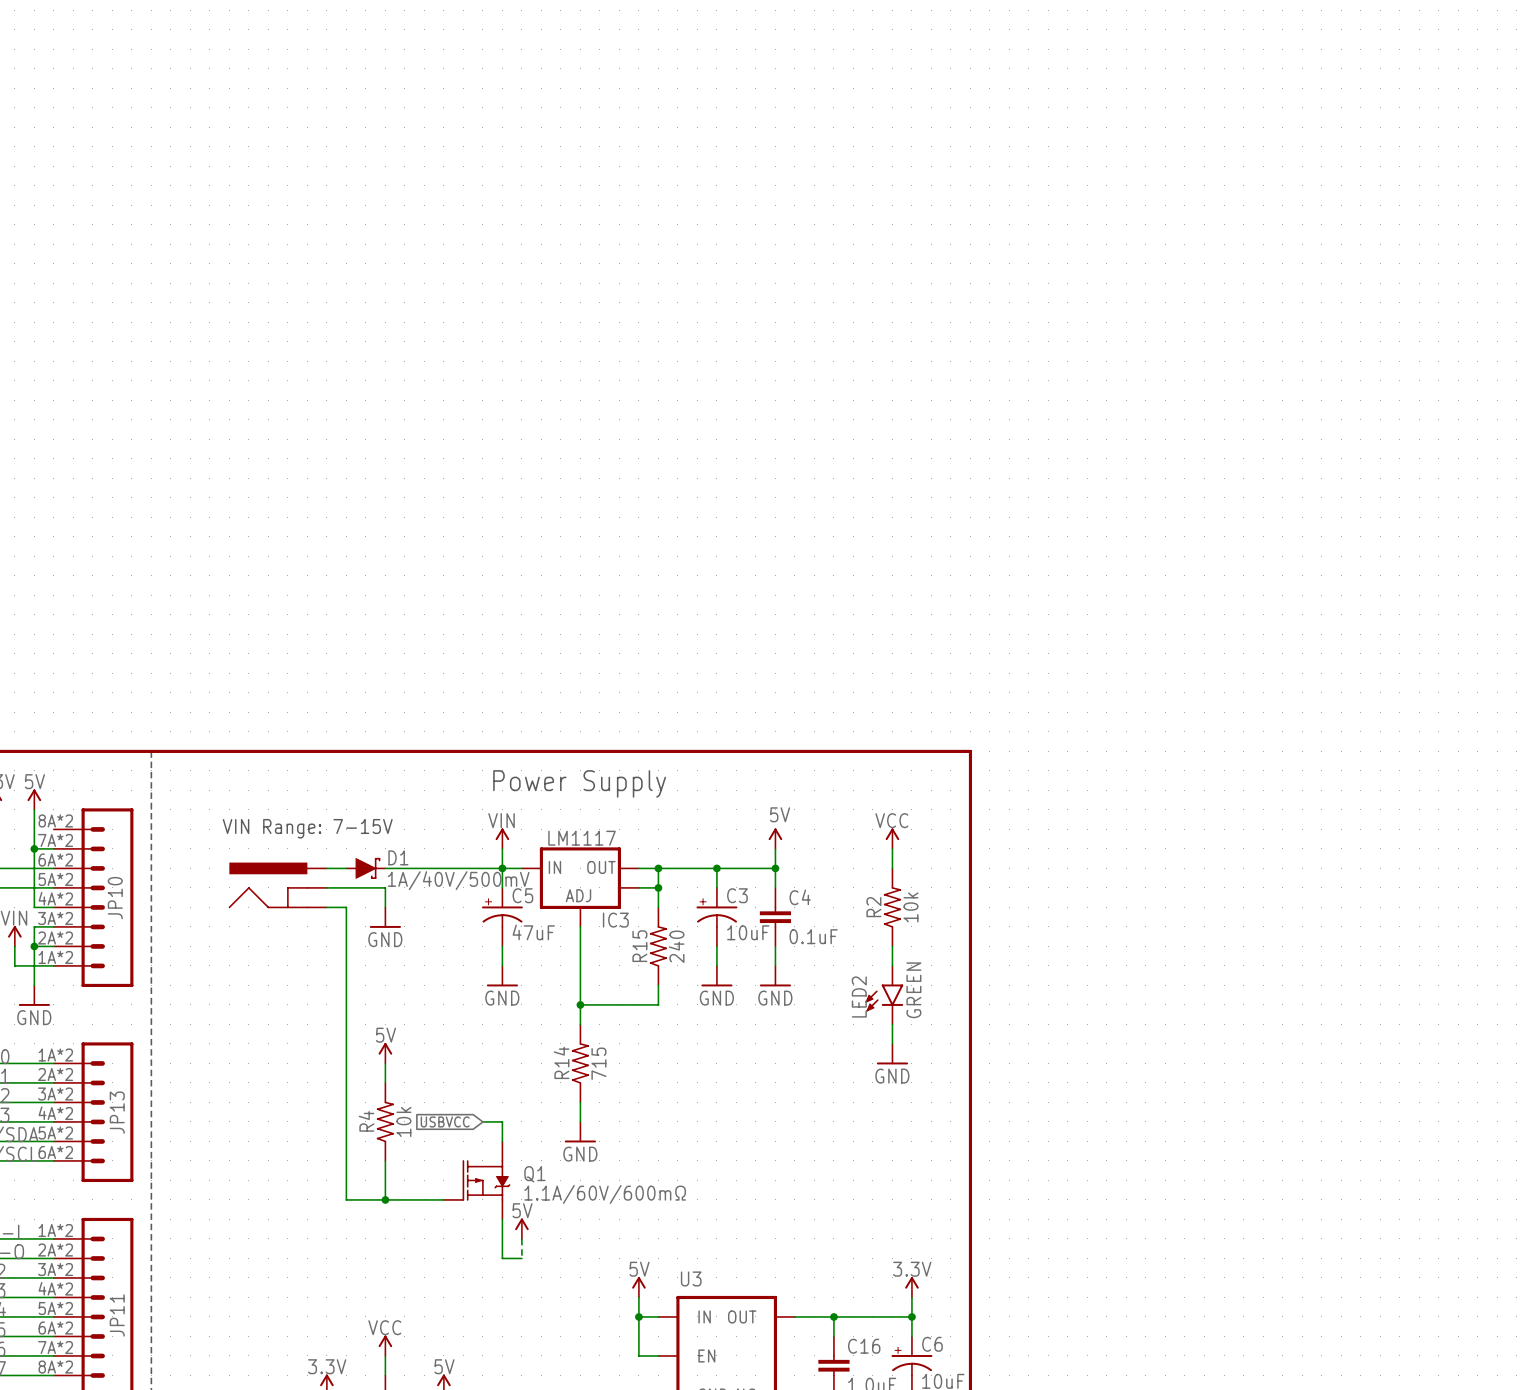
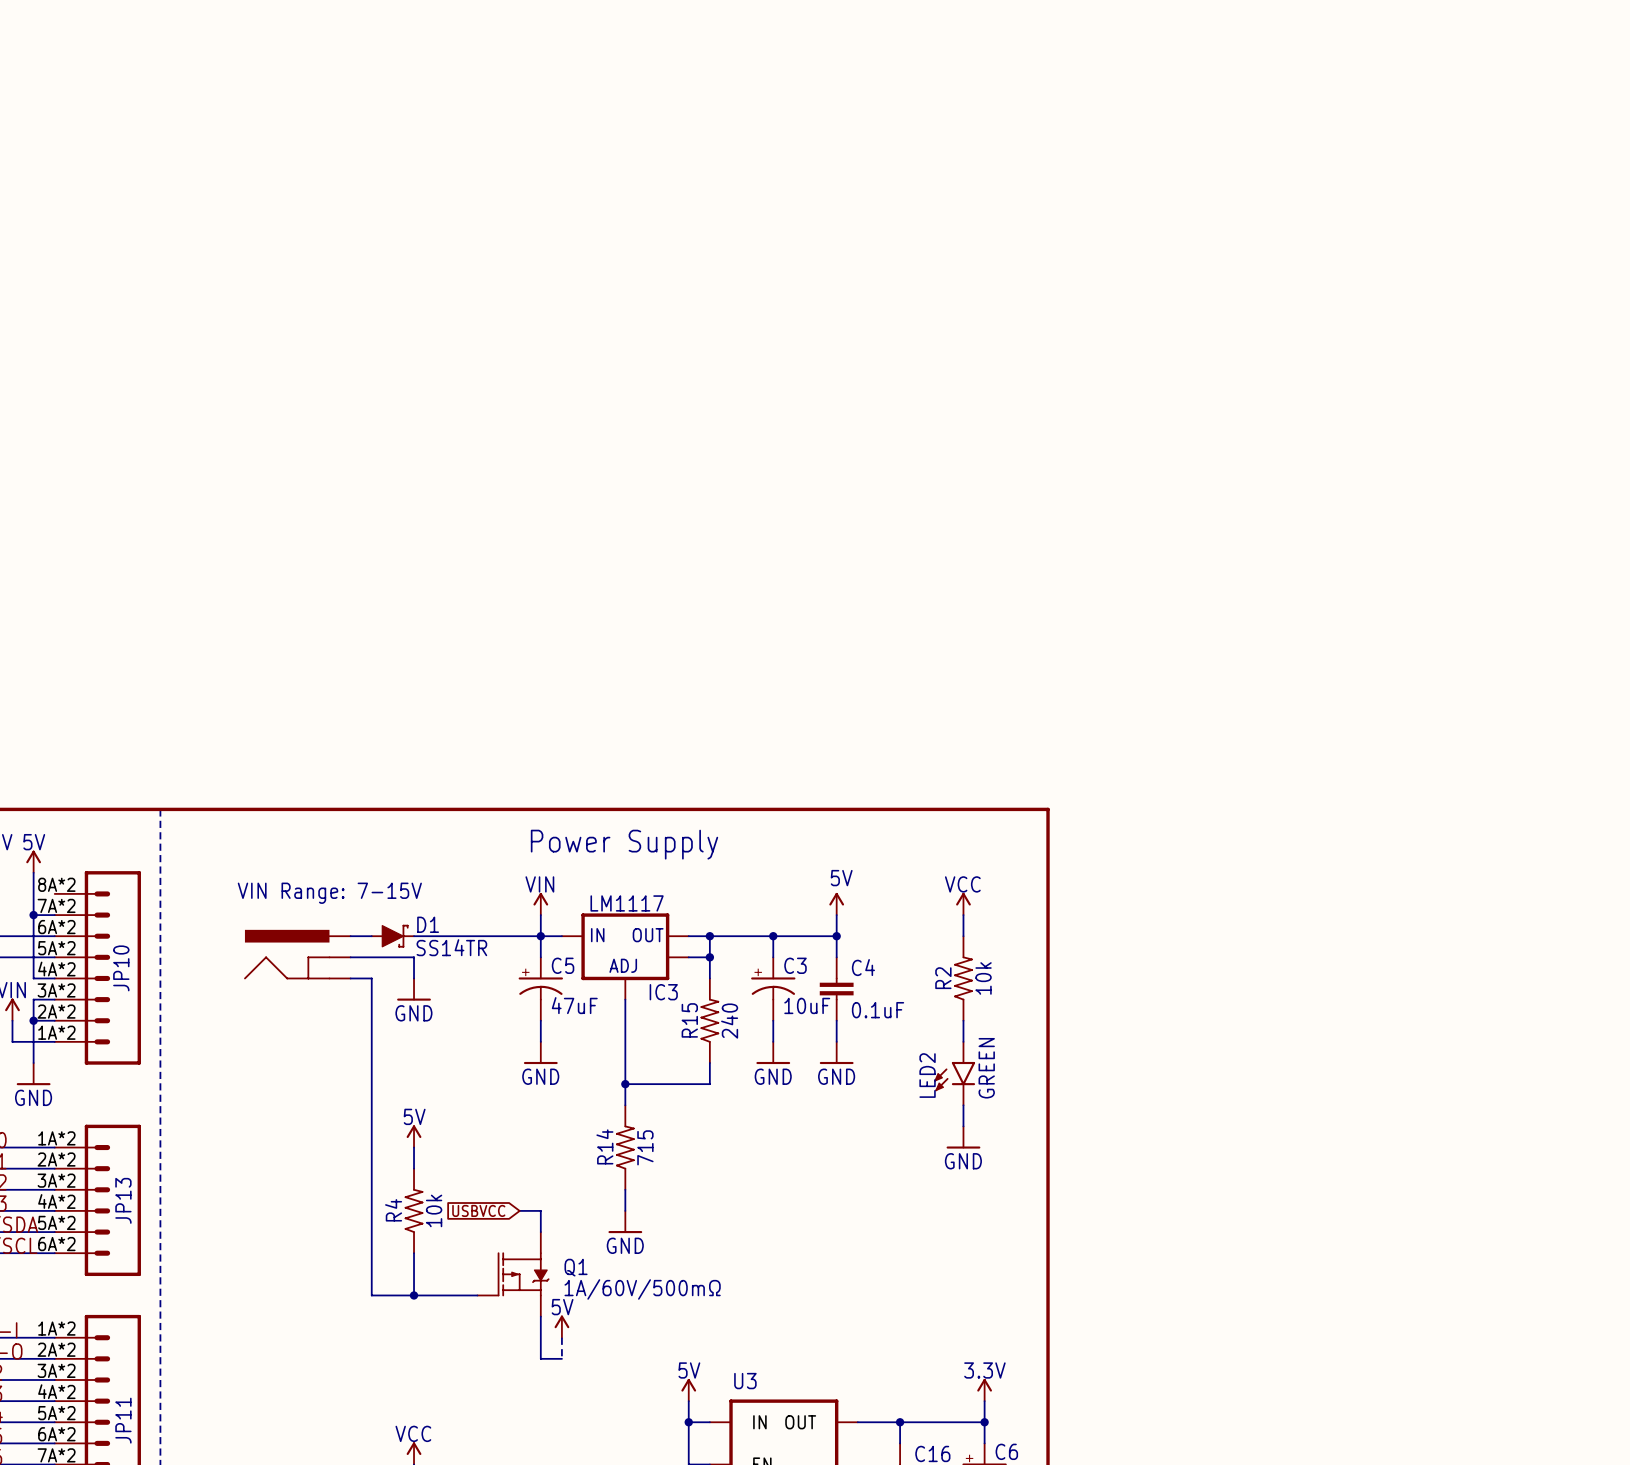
D1 value: 1A/40V/500mV (458, 880) -> SS14TR (451, 947)
Q1 value: 1.1A/60V/600mΩ (605, 1194) -> 1A/60V/500mΩ (642, 1289)

